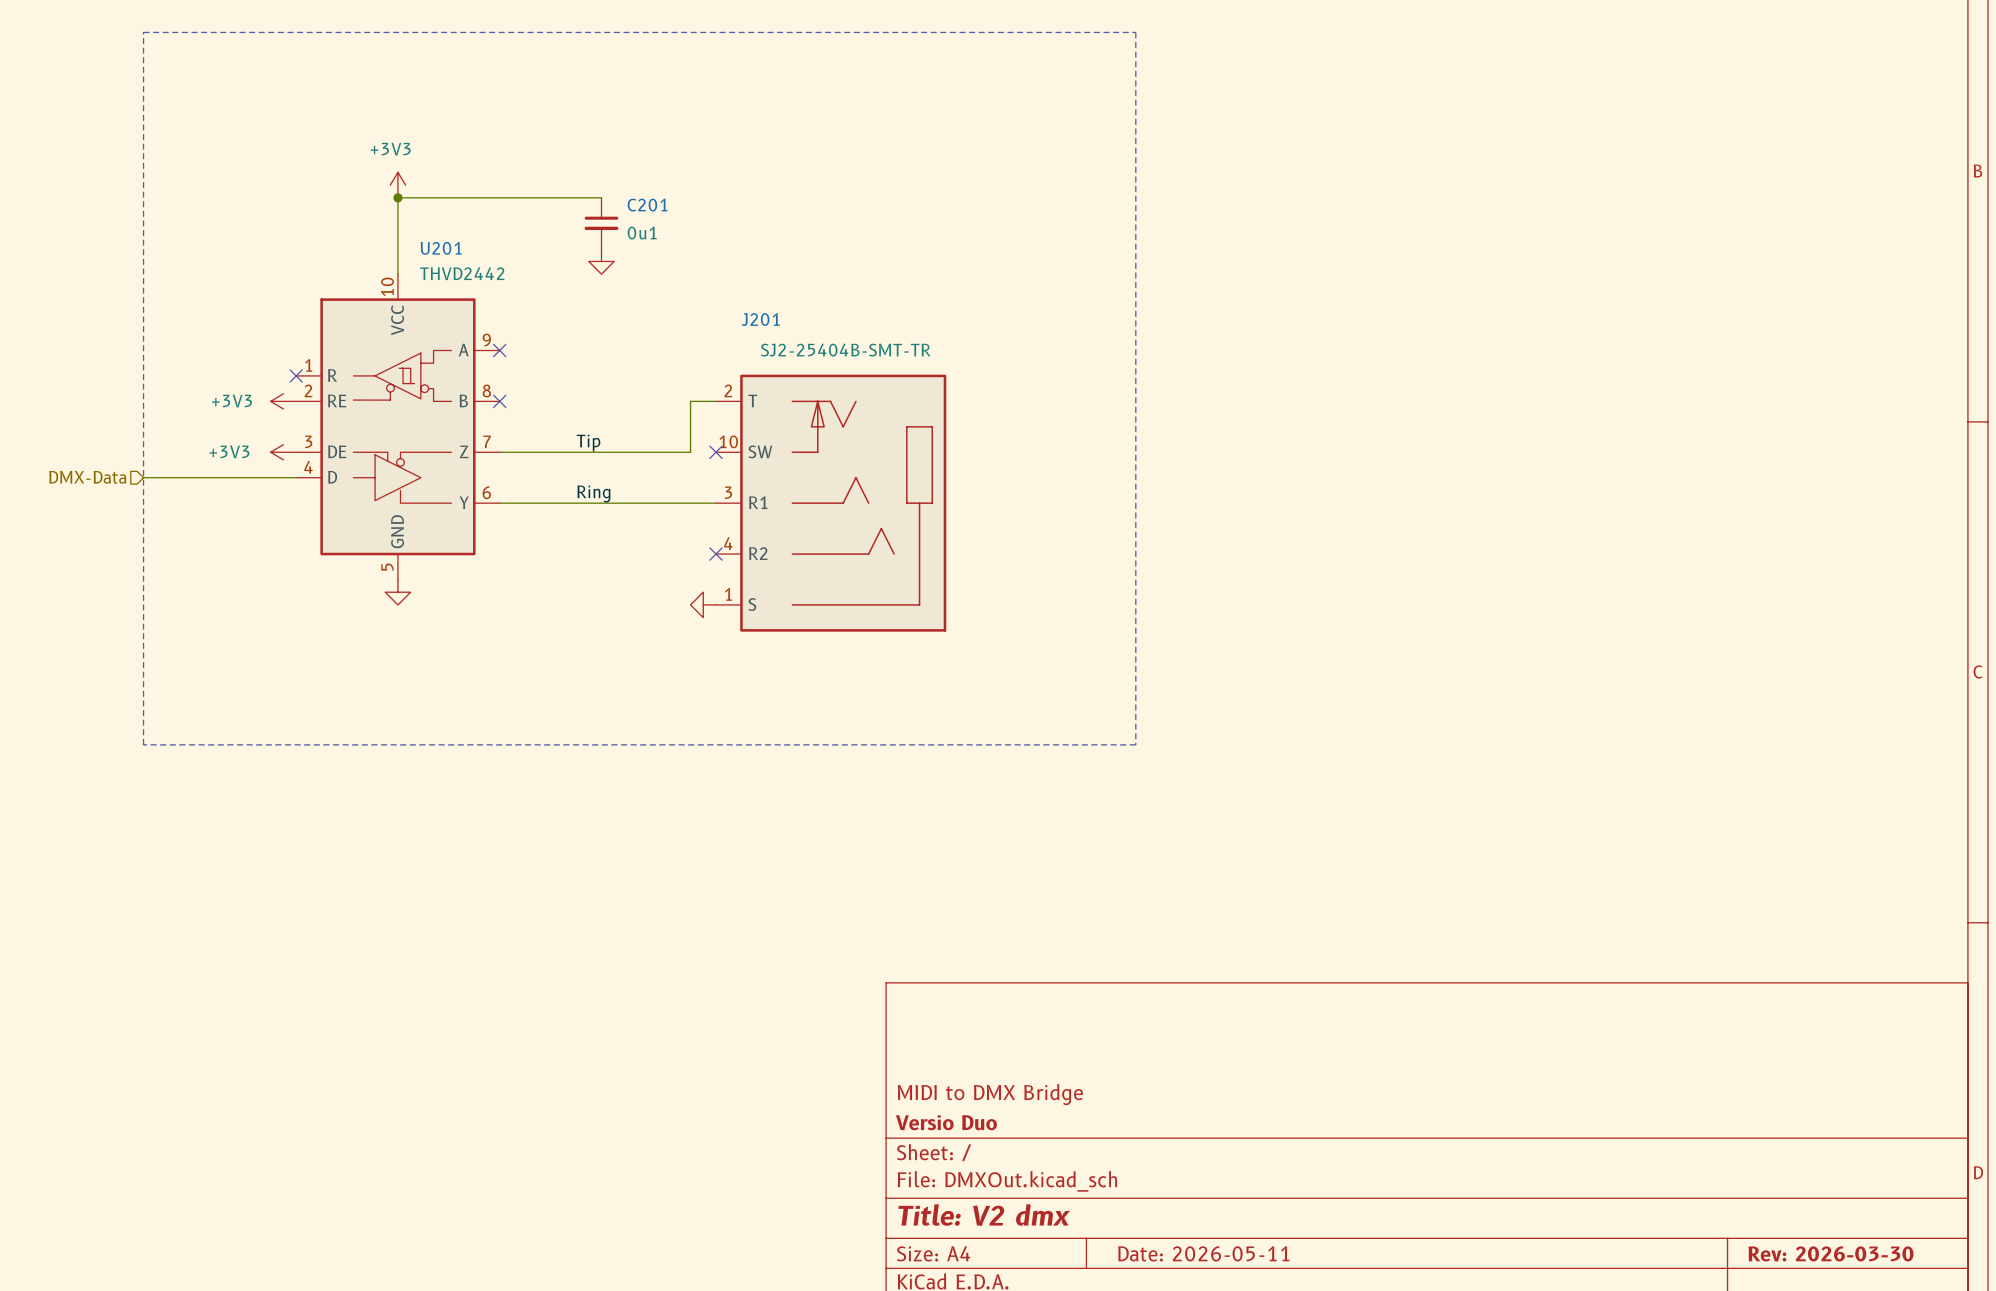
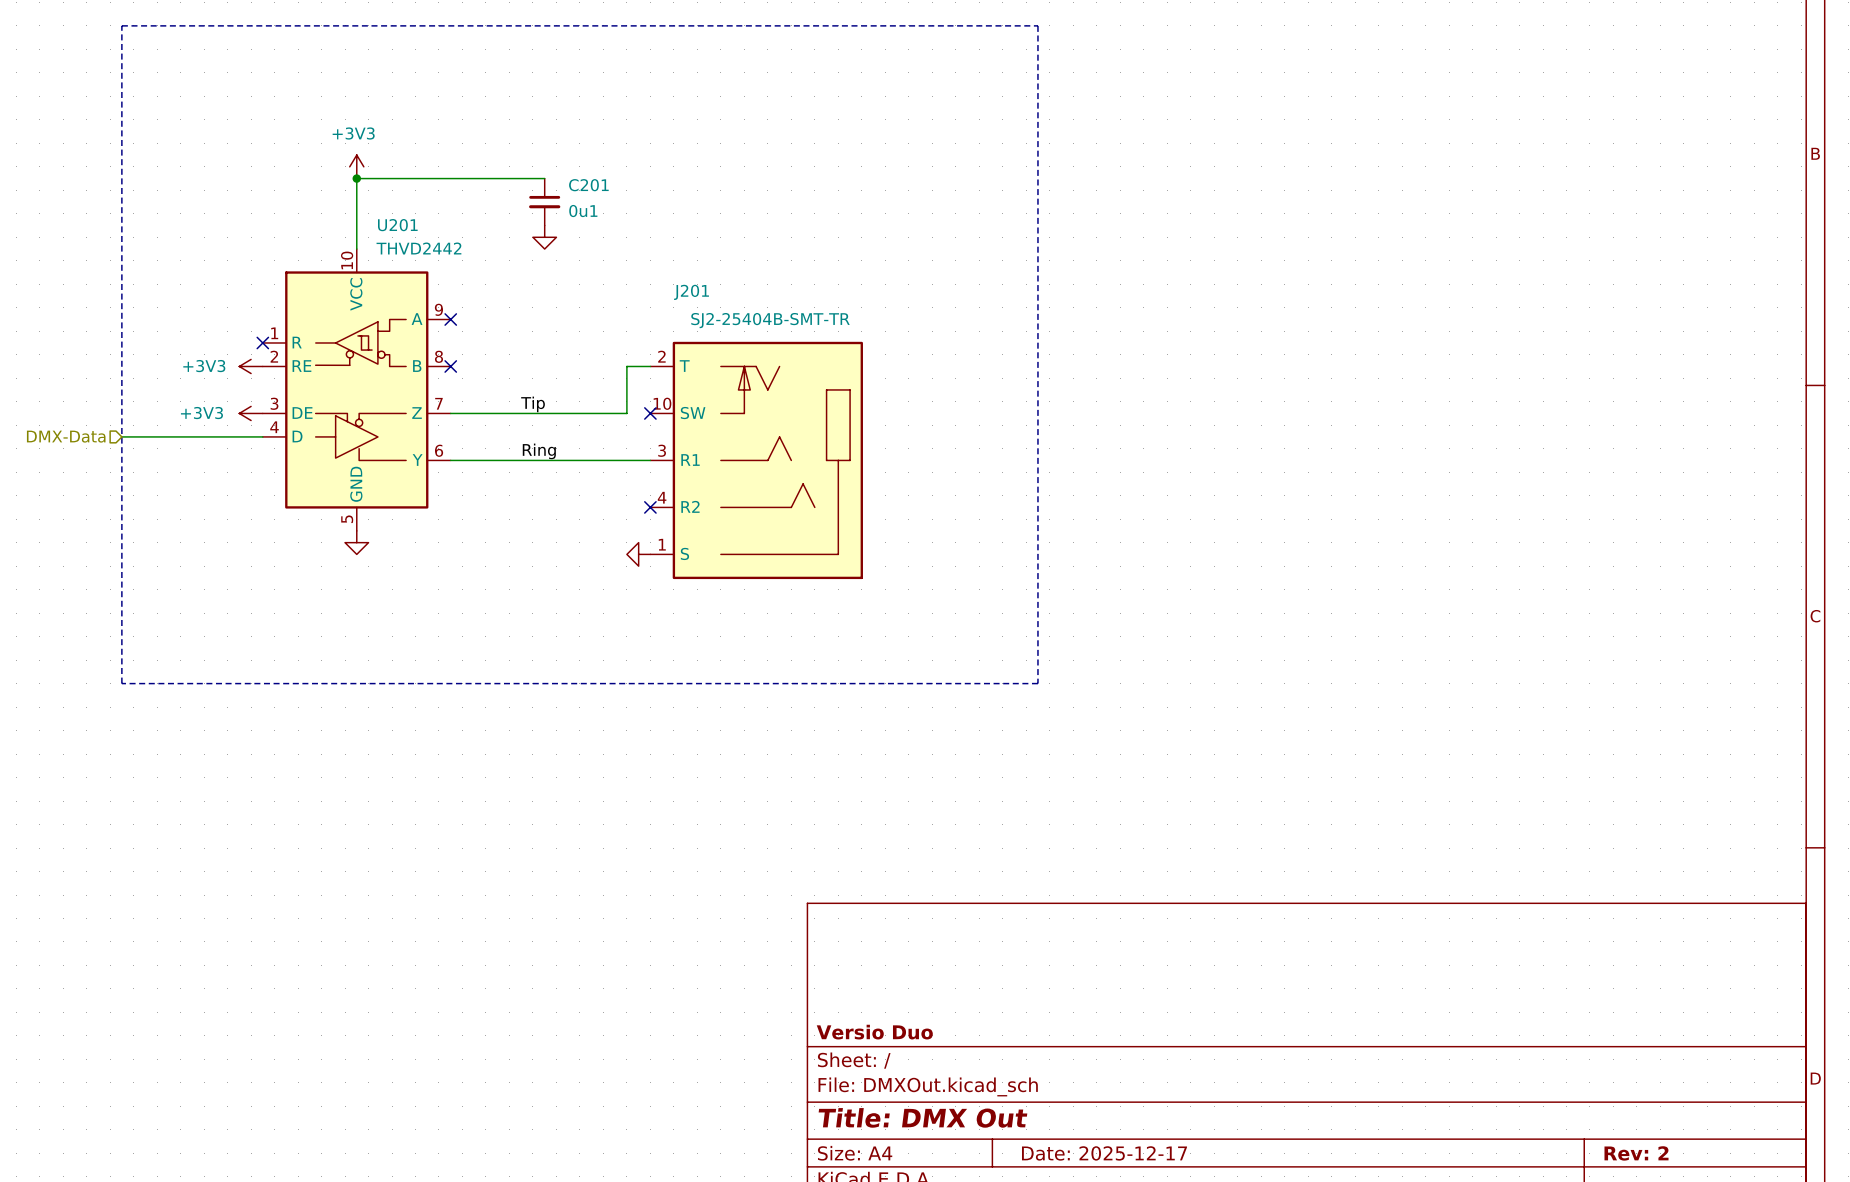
title block: MIDI to DMX Bridge (990, 1094) -> none
title block: Title: V2 dmx (984, 1215) -> Title: DMX Out (922, 1117)
title block: Date: 2026-05-11 (1203, 1253) -> Date: 2025-12-17 (1104, 1153)
title block: Rev: 2026-03-30 (1830, 1253) -> Rev: 2 (1636, 1153)

